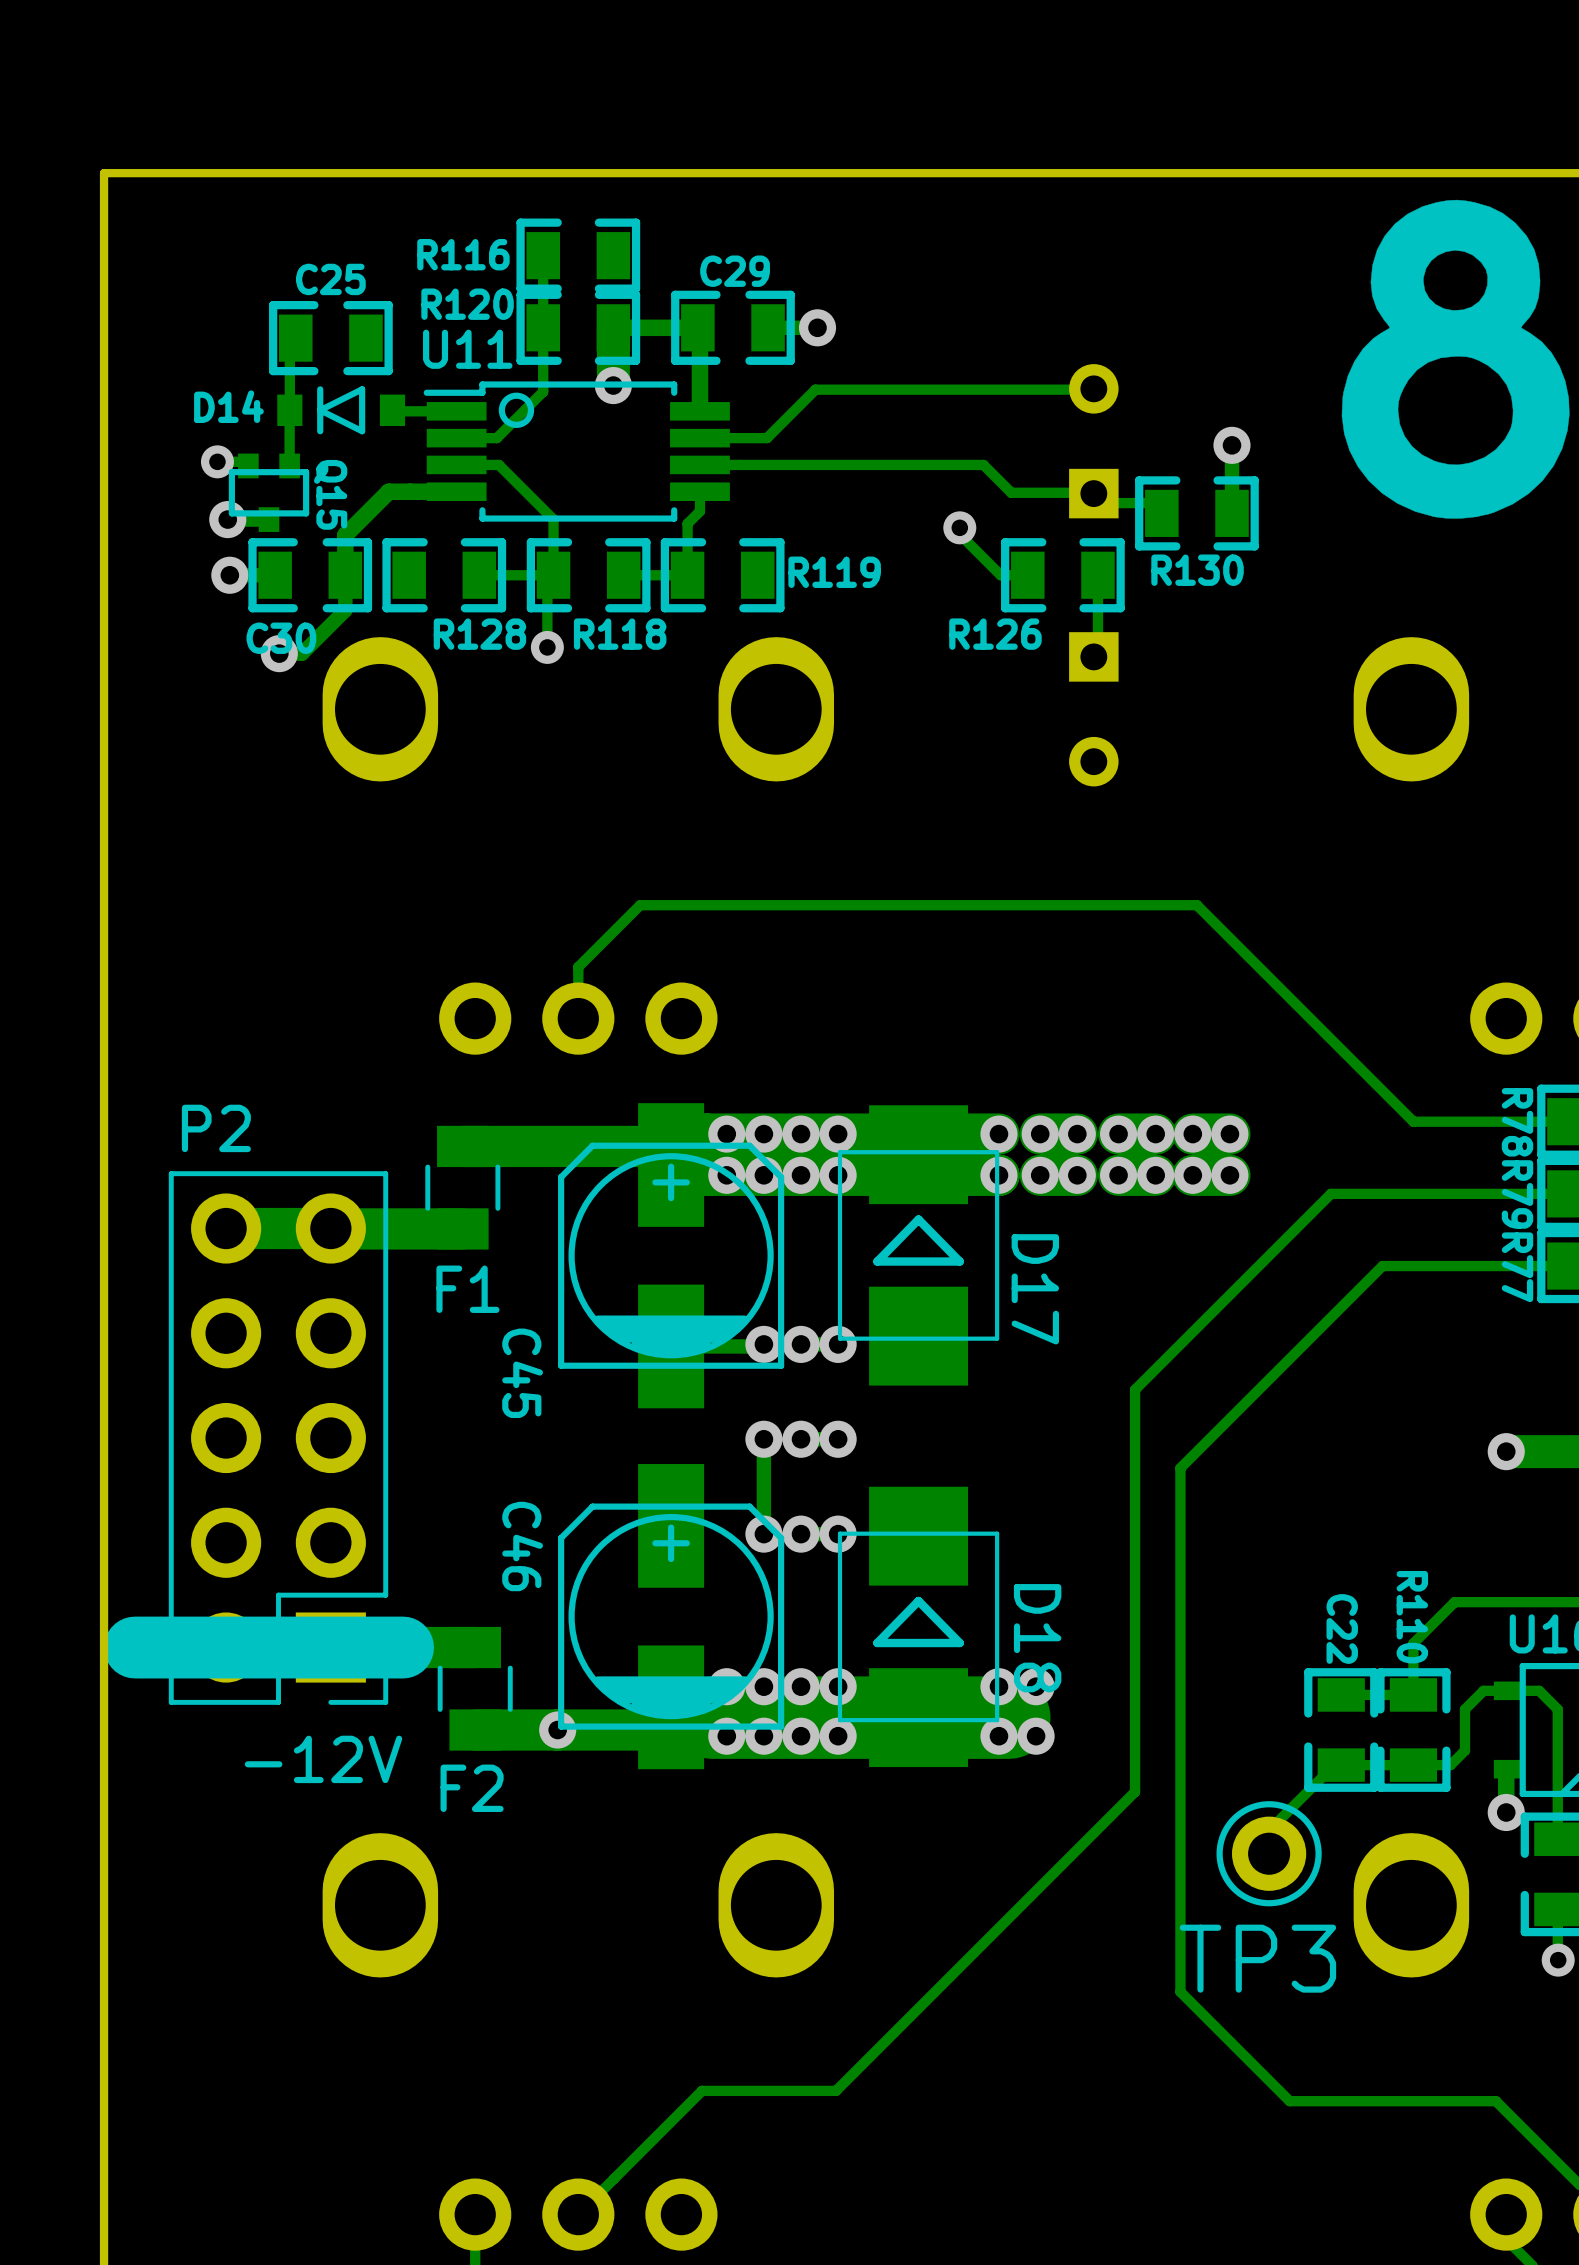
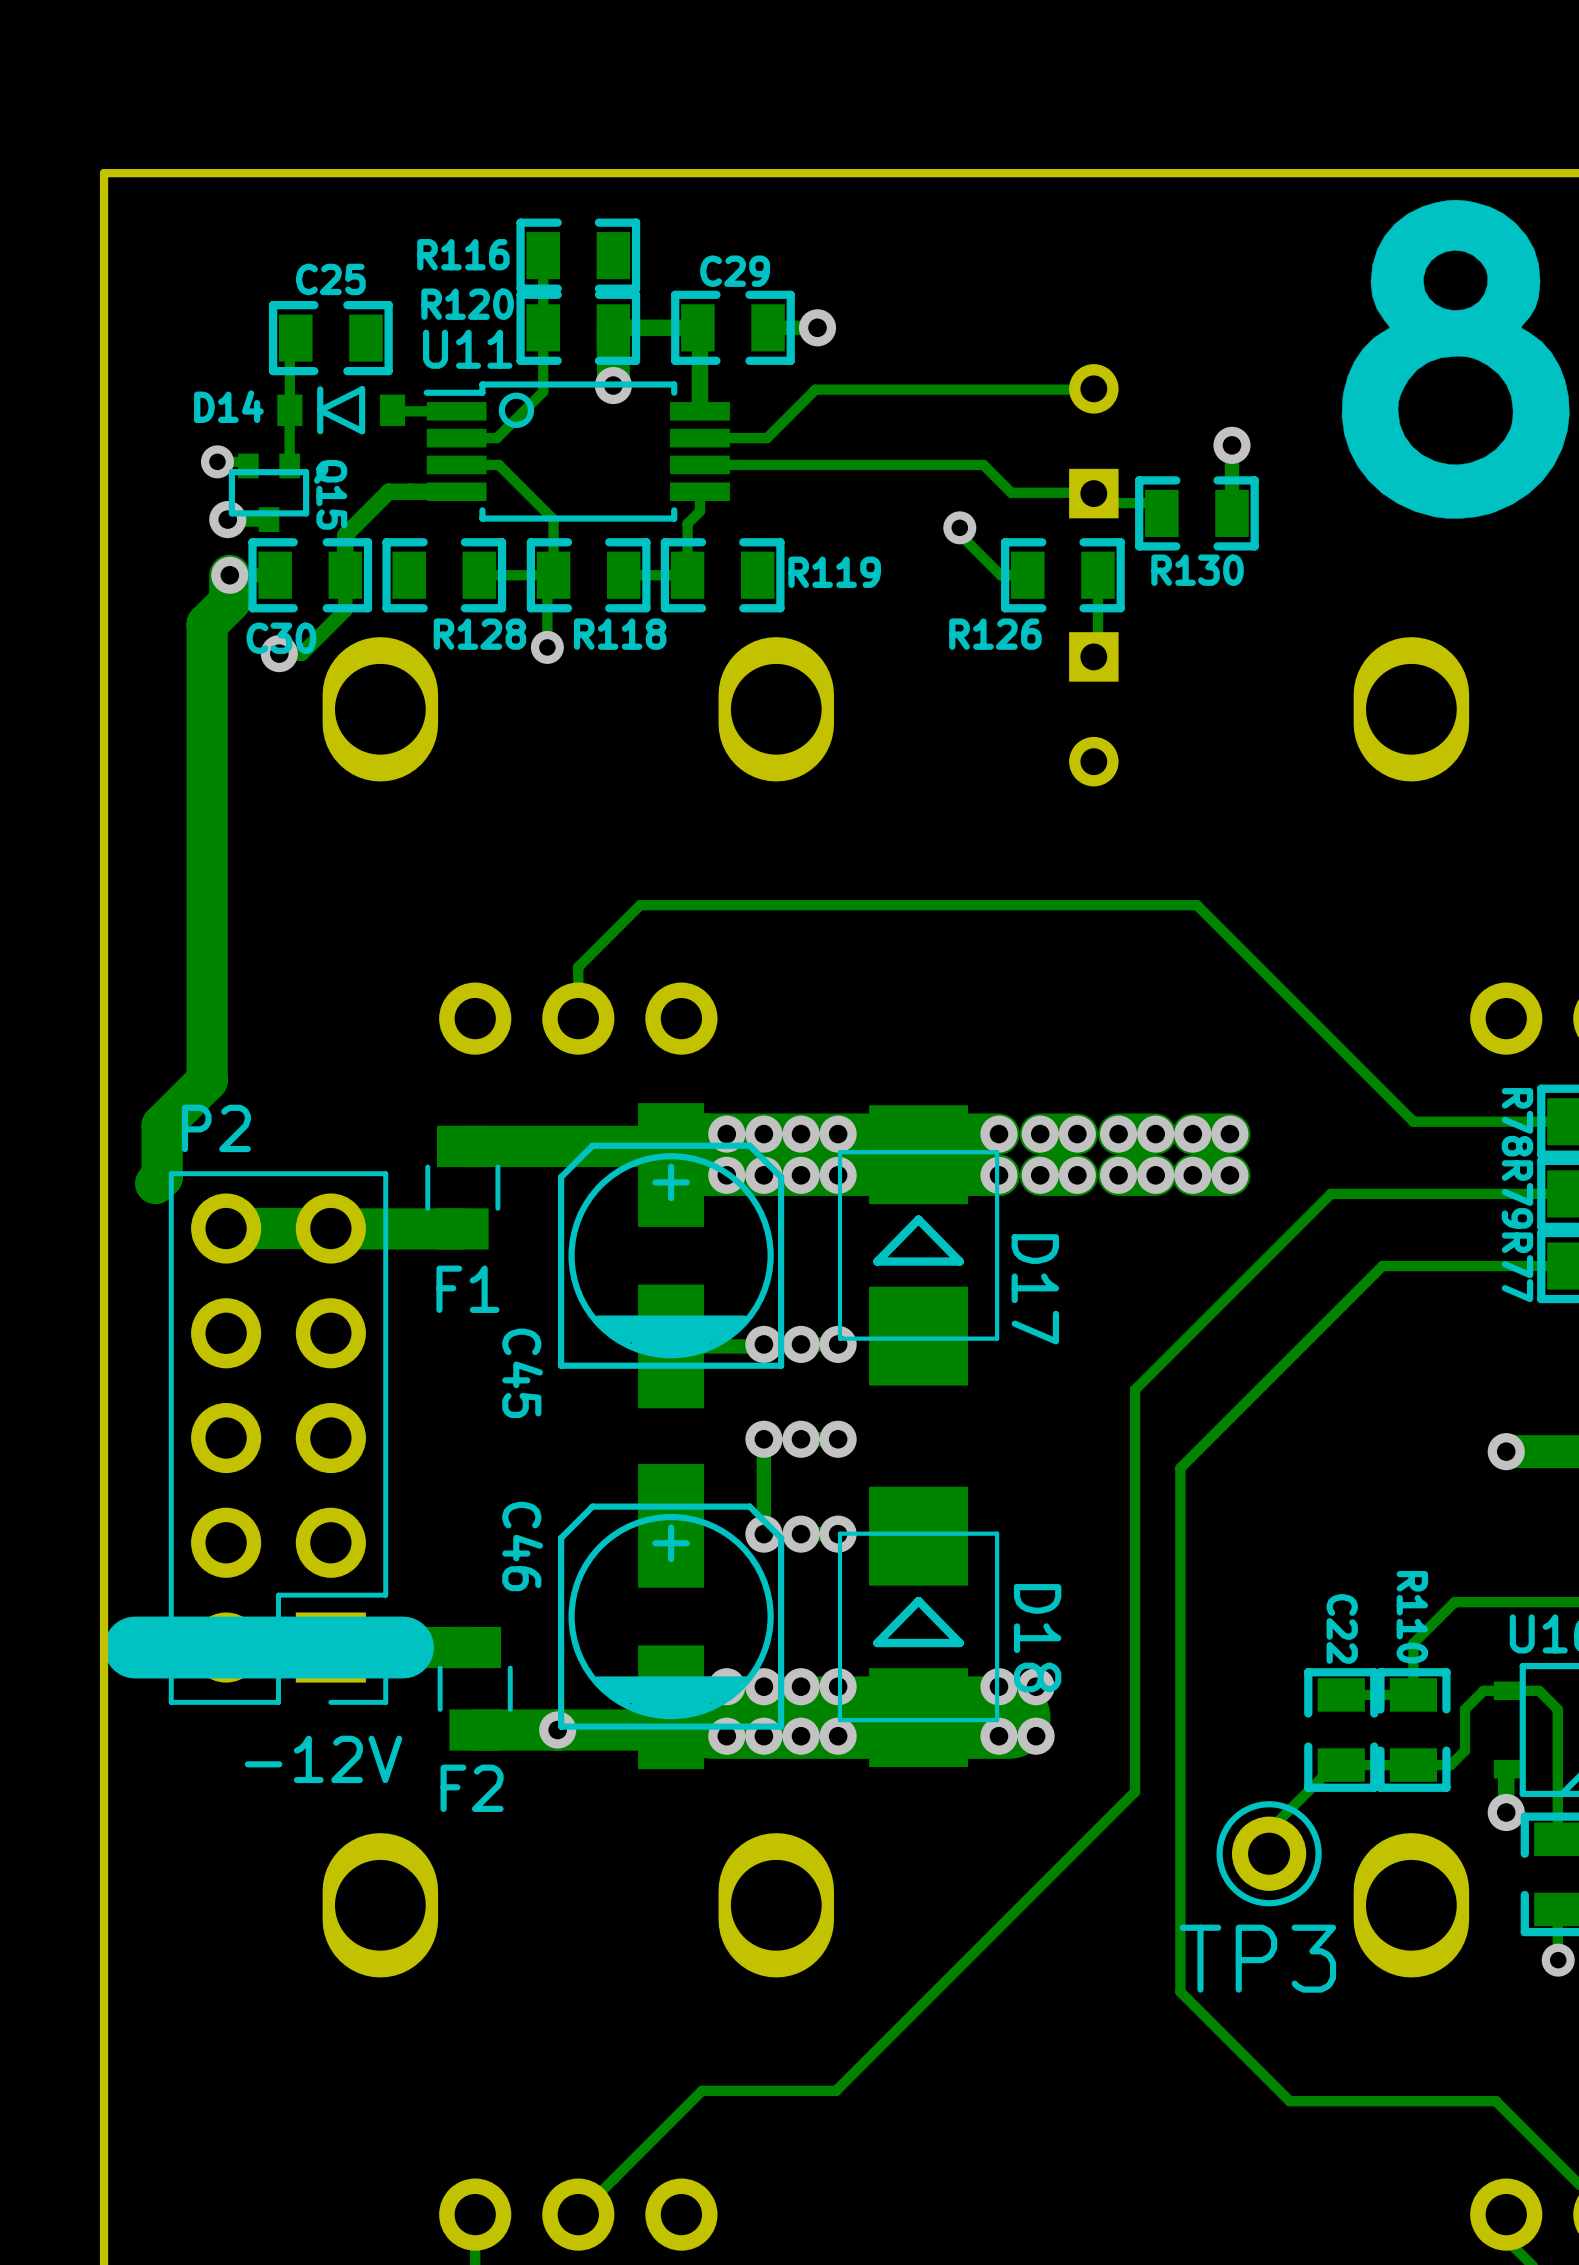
track: none -> (229, 575) (229, 601) (207, 624) (207, 1080) (162, 1125) (162, 1176) (155, 1183)

